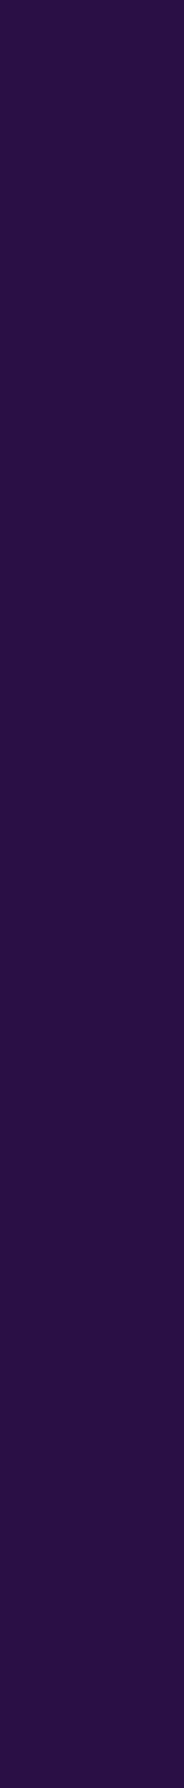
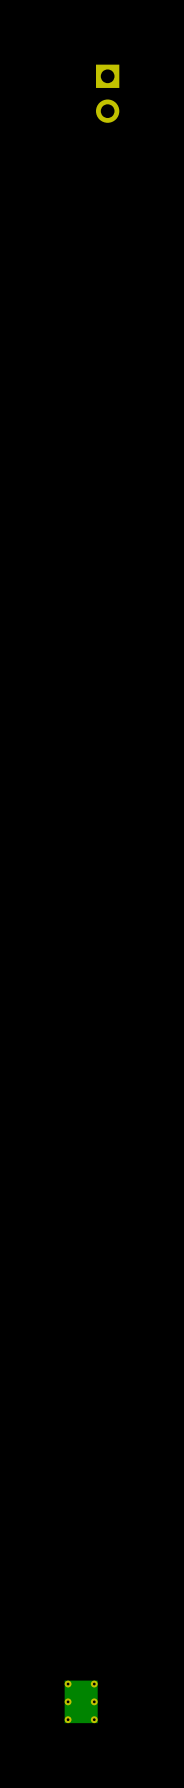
part: none -> (107, 93)
part: none -> (81, 1701)

